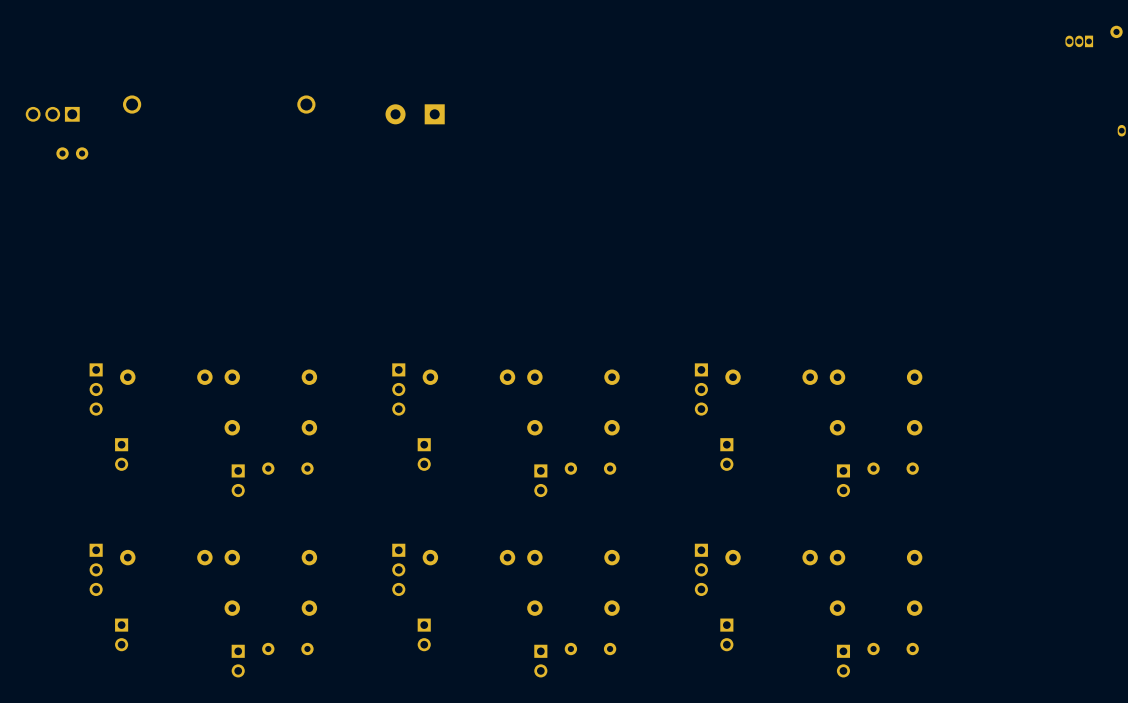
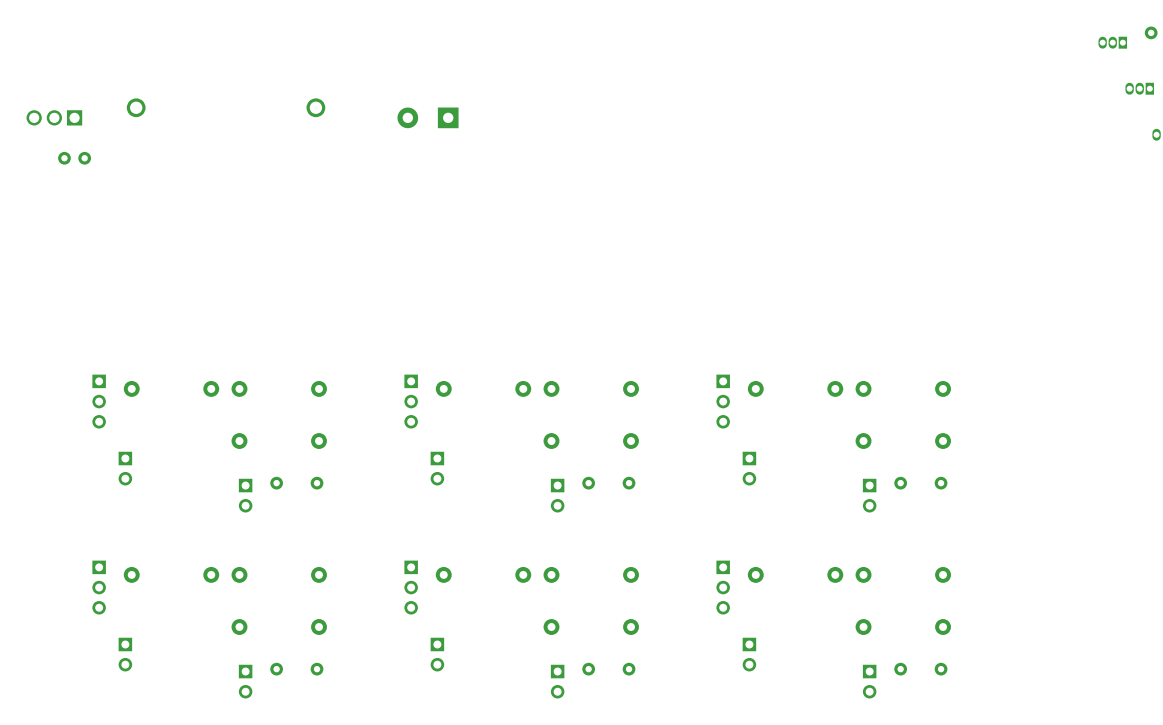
part: none -> (1139, 88)

